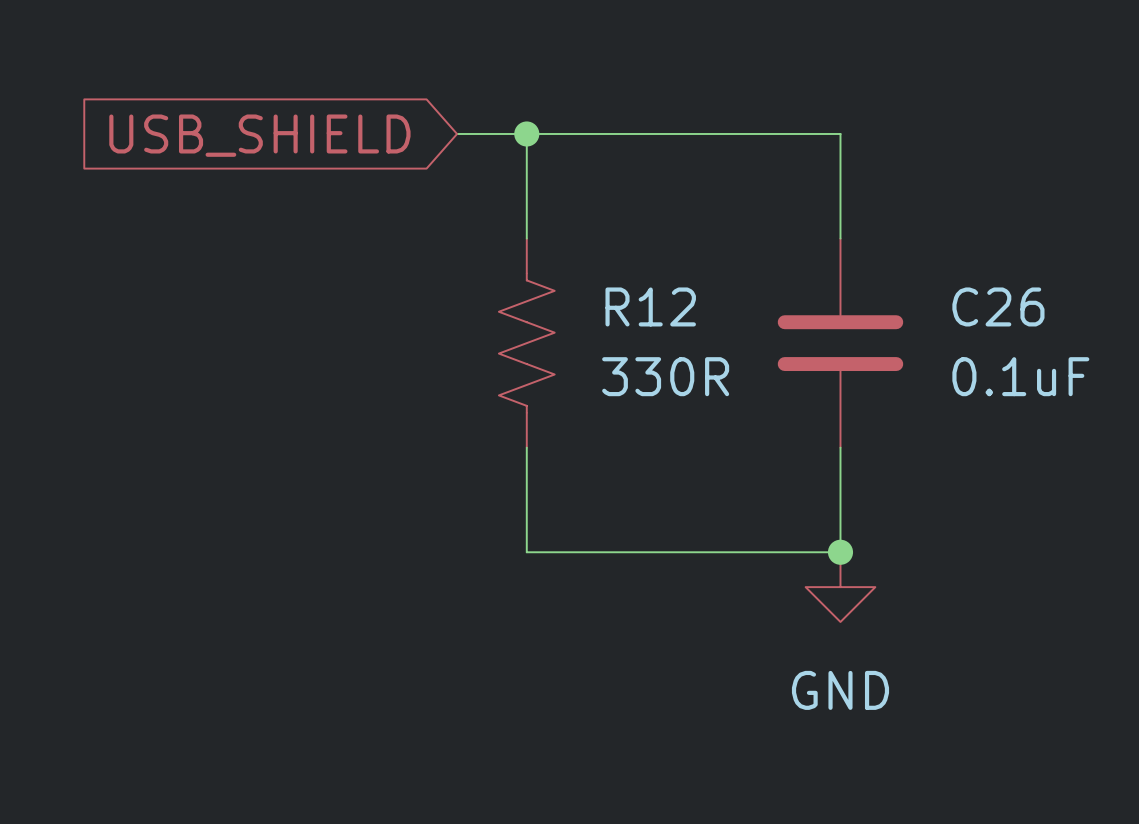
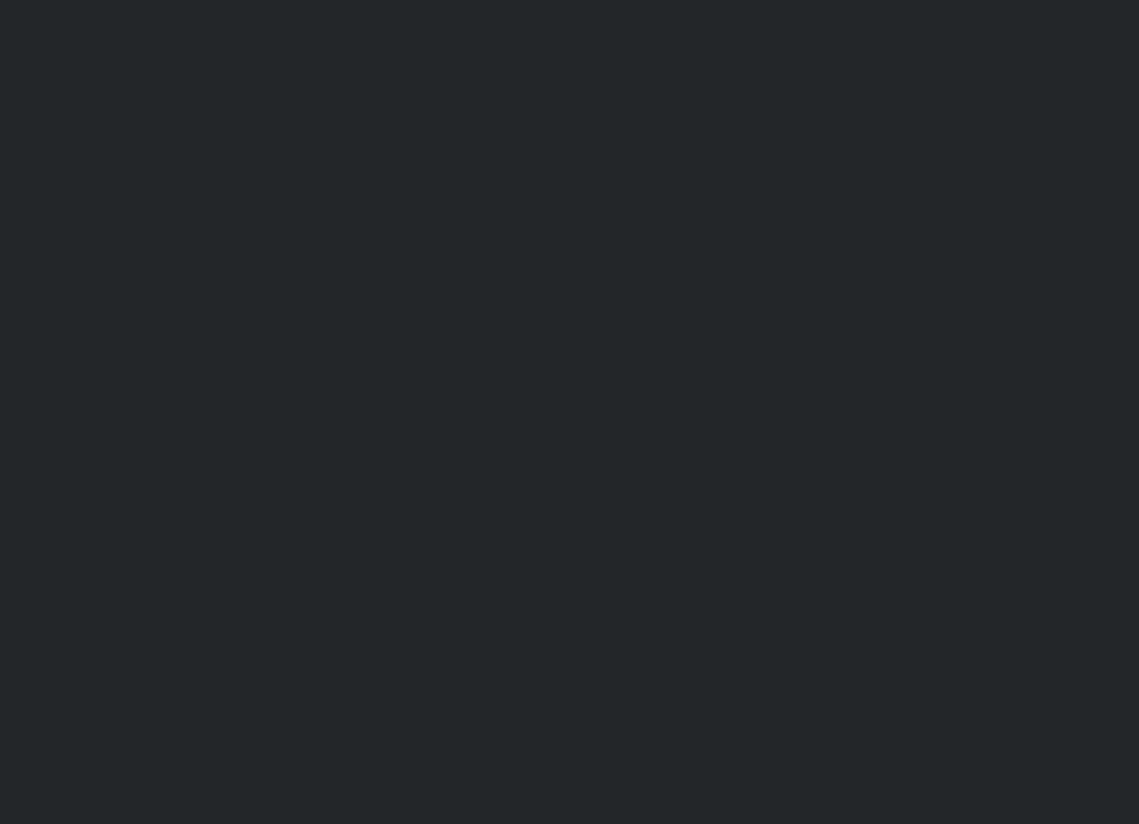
wire: (457, 133) (840, 133) (840, 238) -> none
wire: (526, 133) (526, 238) -> none
junction: (526, 133) -> none
global label: USB_SHIELD (259, 135) -> none
R12: 330R (526, 343) -> none
C26: 0.1uF (840, 343) -> none
wire: (526, 447) (526, 552) (840, 552) (840, 447) -> none
junction: (840, 552) -> none
power symbol: GND (840, 587) -> none

